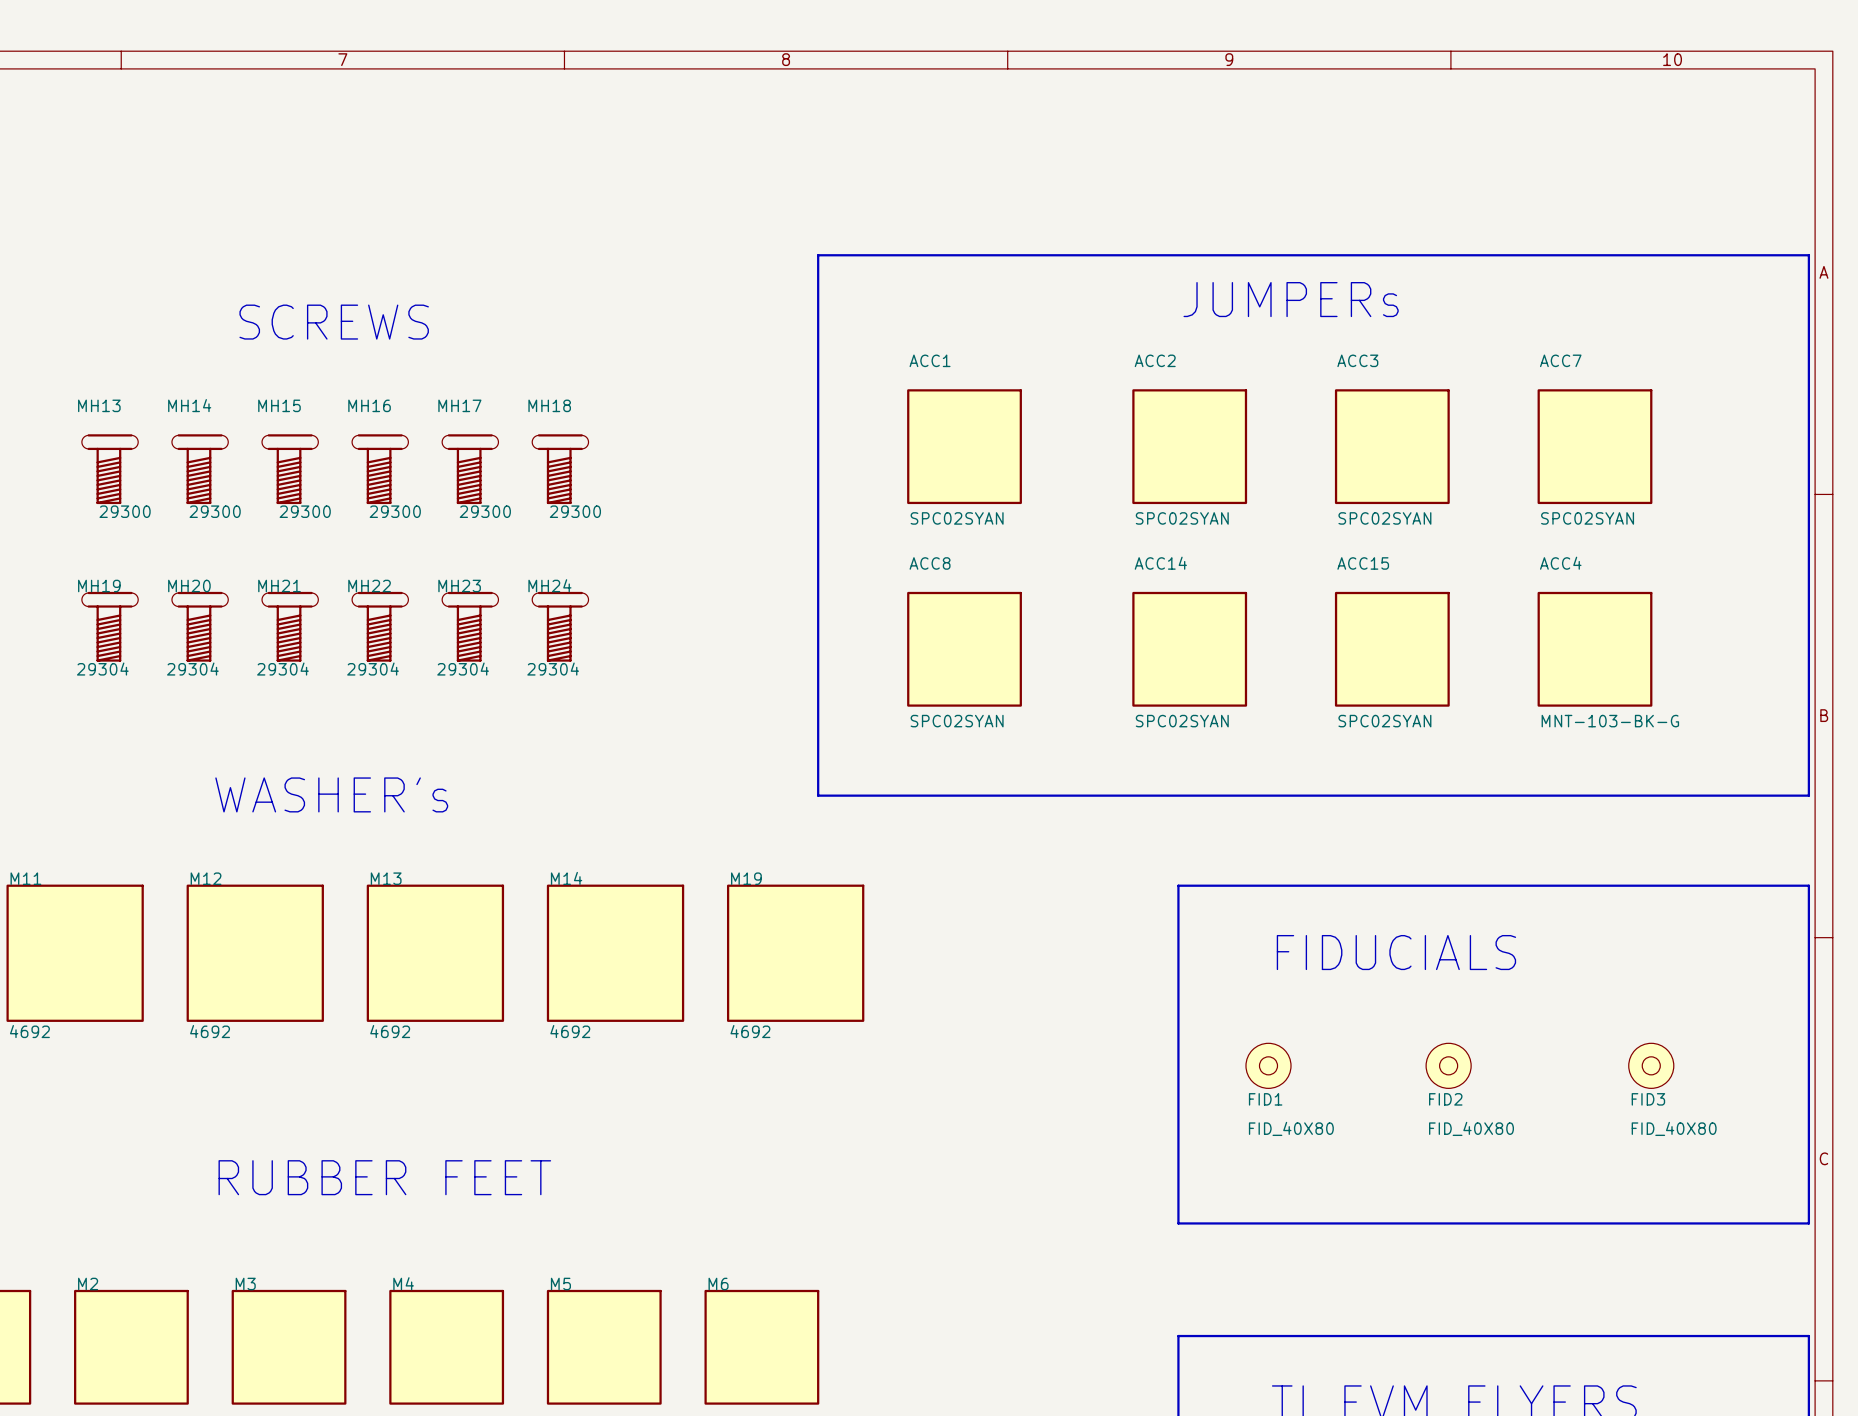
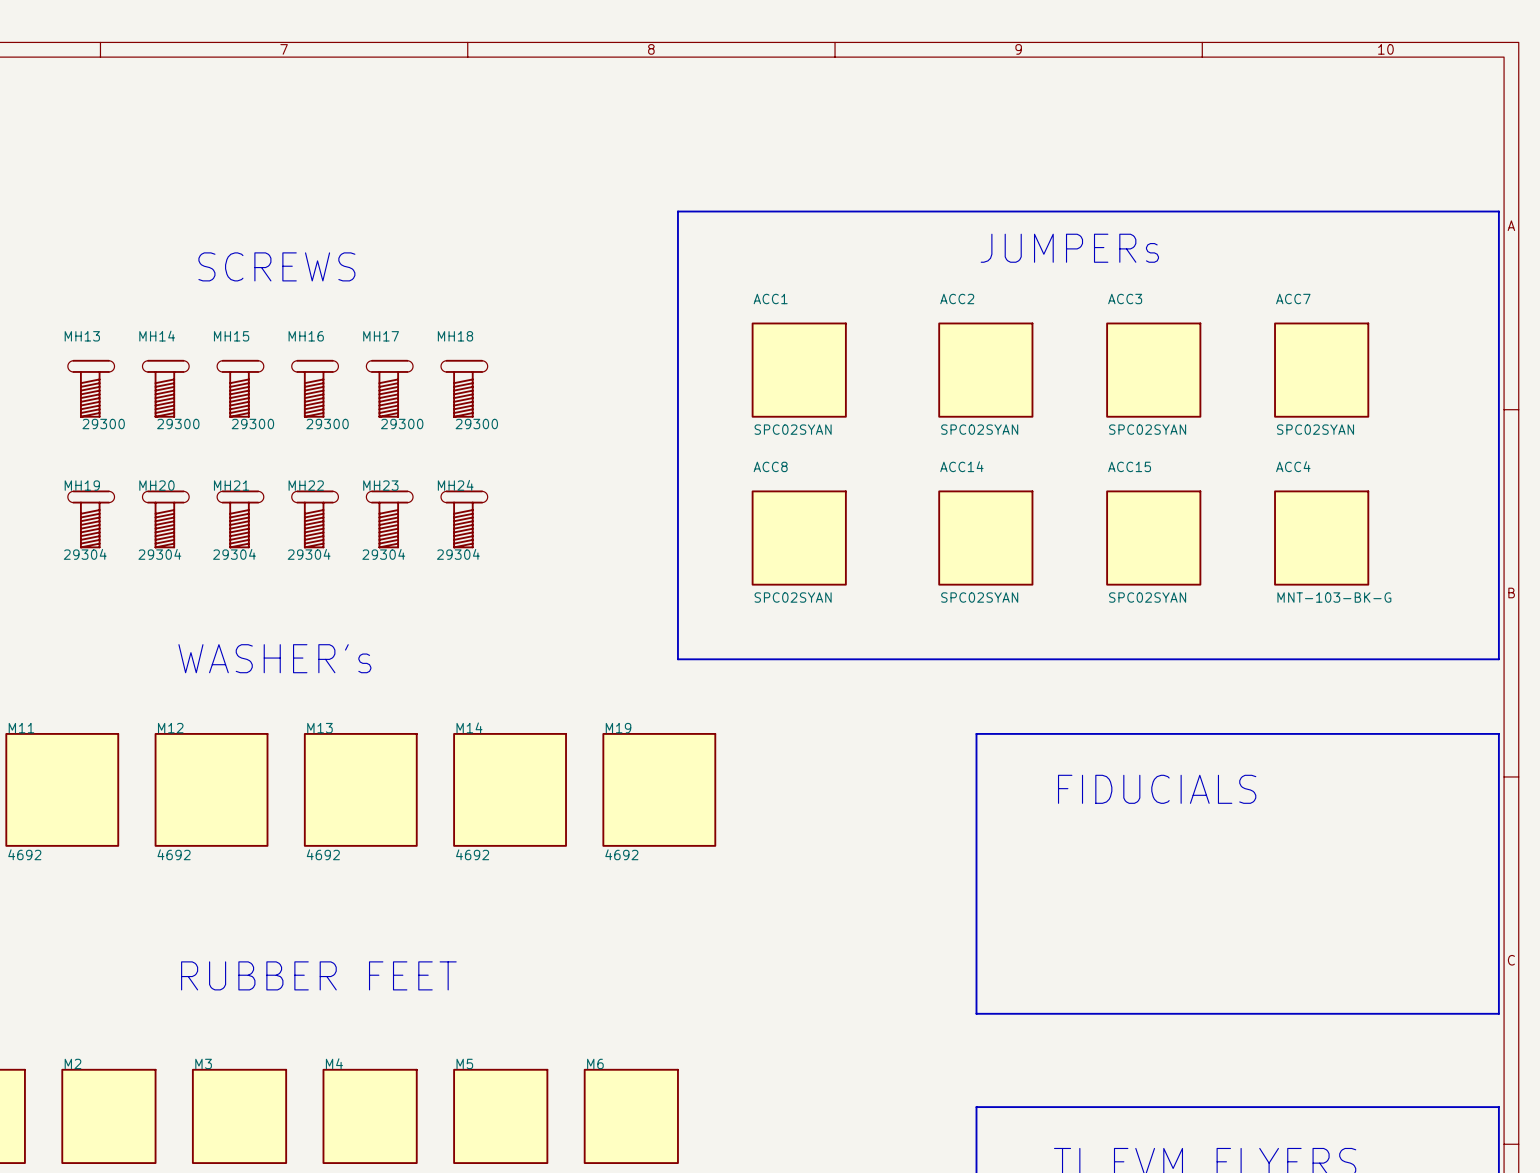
FID1: FID_40X80 (1268, 1065) -> none
FID2: FID_40X80 (1448, 1065) -> none
FID3: FID_40X80 (1651, 1065) -> none

